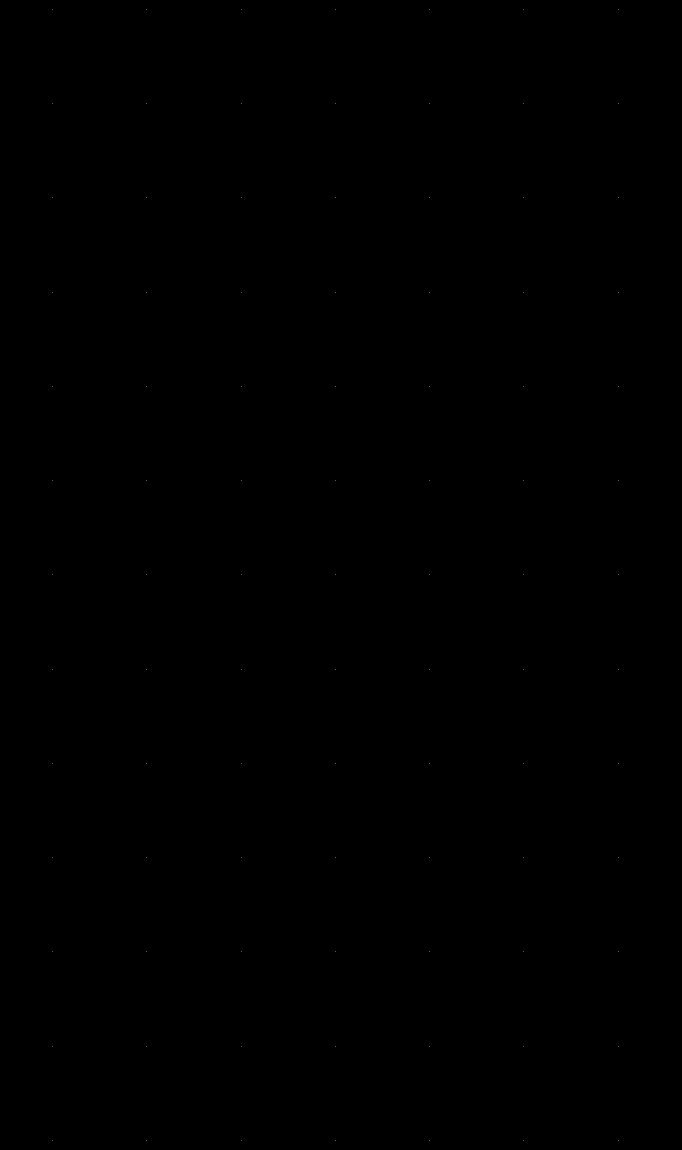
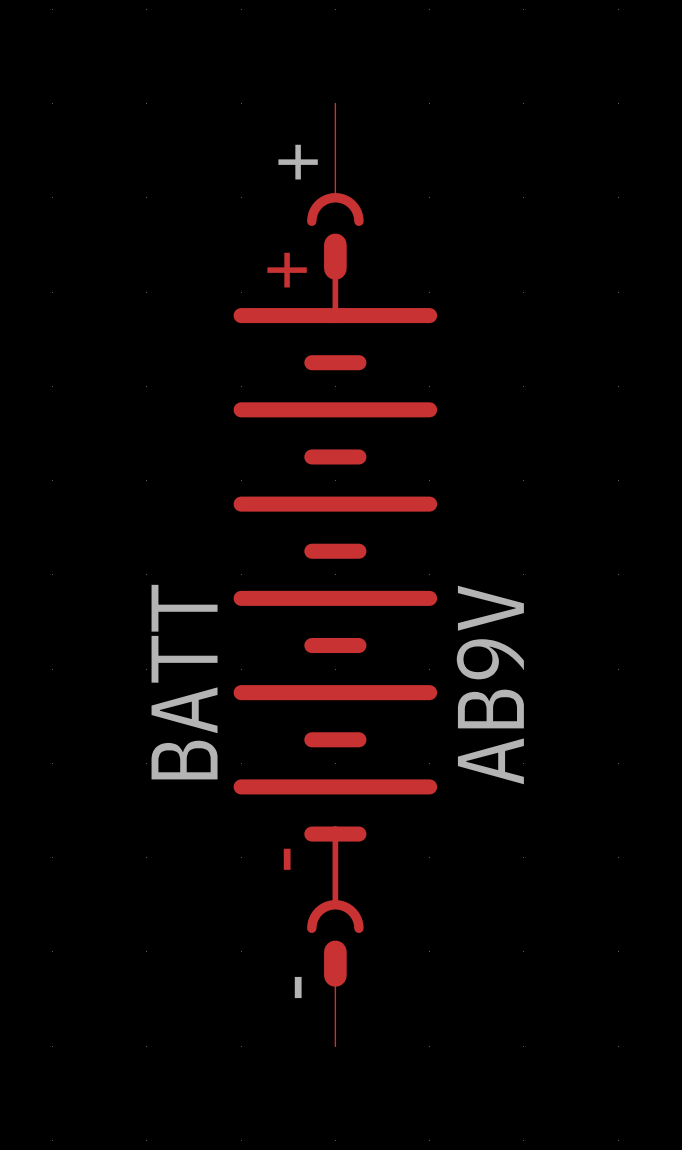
BATT: none -> AB9V (335, 574)

